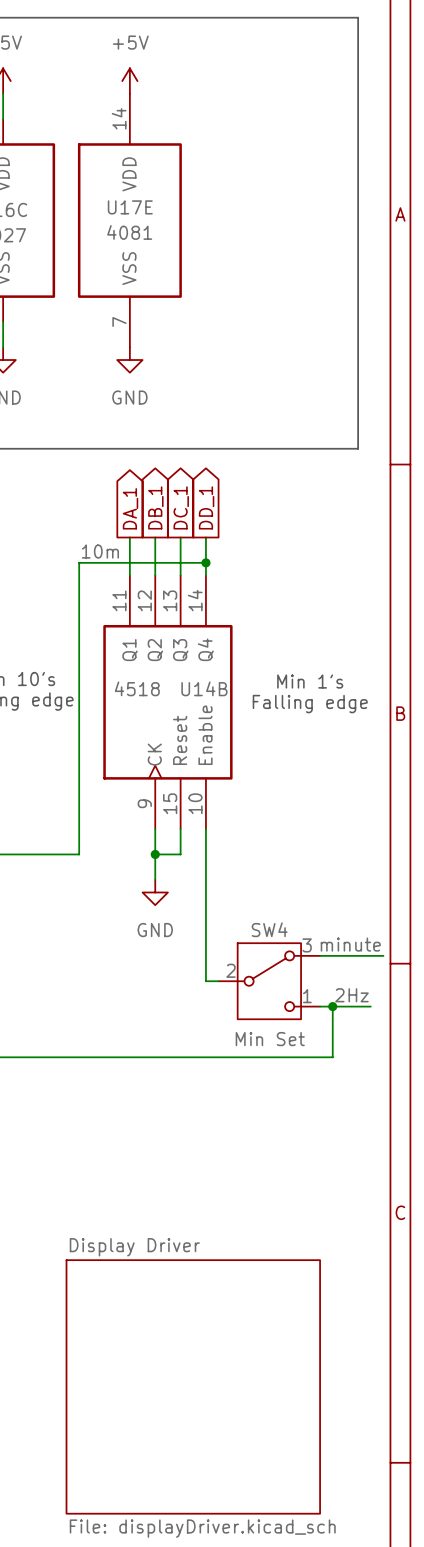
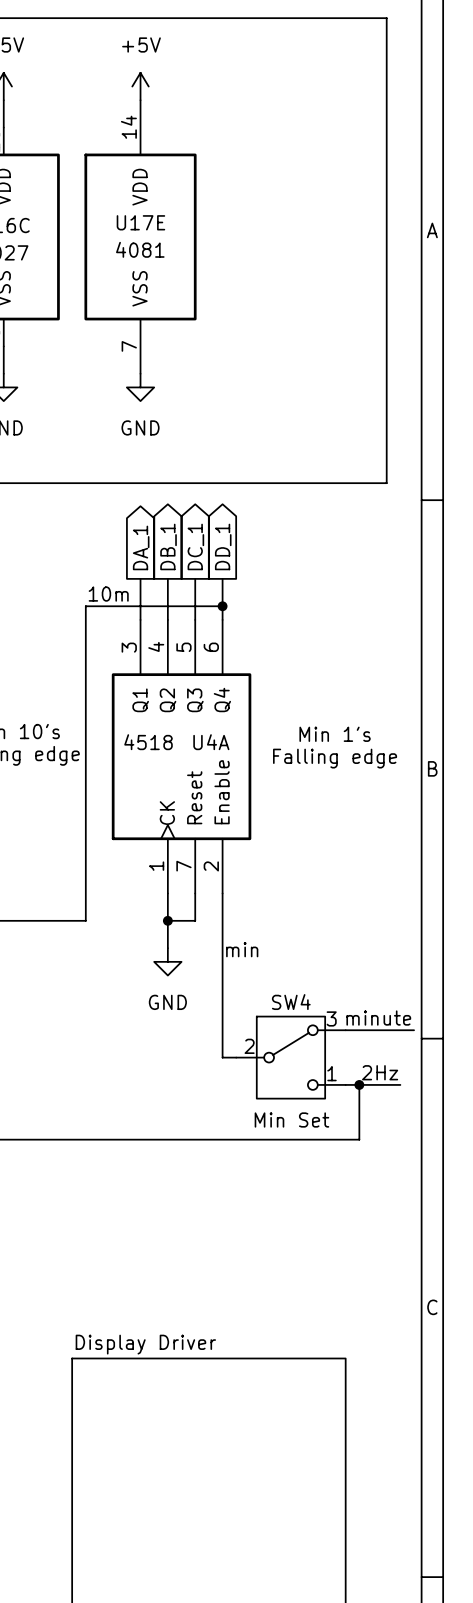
U14B pin number: 11 (119, 600) -> 3 (129, 647)
U14B pin number: 12 (144, 600) -> 4 (156, 646)
U14B pin number: 13 (170, 600) -> 5 (183, 647)
U14B pin number: 14 (195, 600) -> 6 (211, 647)
U14B name: U14B (204, 688) -> U4A (211, 742)
U14B pin number: 9 (144, 803) -> 1 (156, 866)
U14B pin number: 15 (170, 803) -> 7 (183, 866)
U14B pin number: 10 (195, 803) -> 2 (211, 866)
label: none -> min (242, 949)

